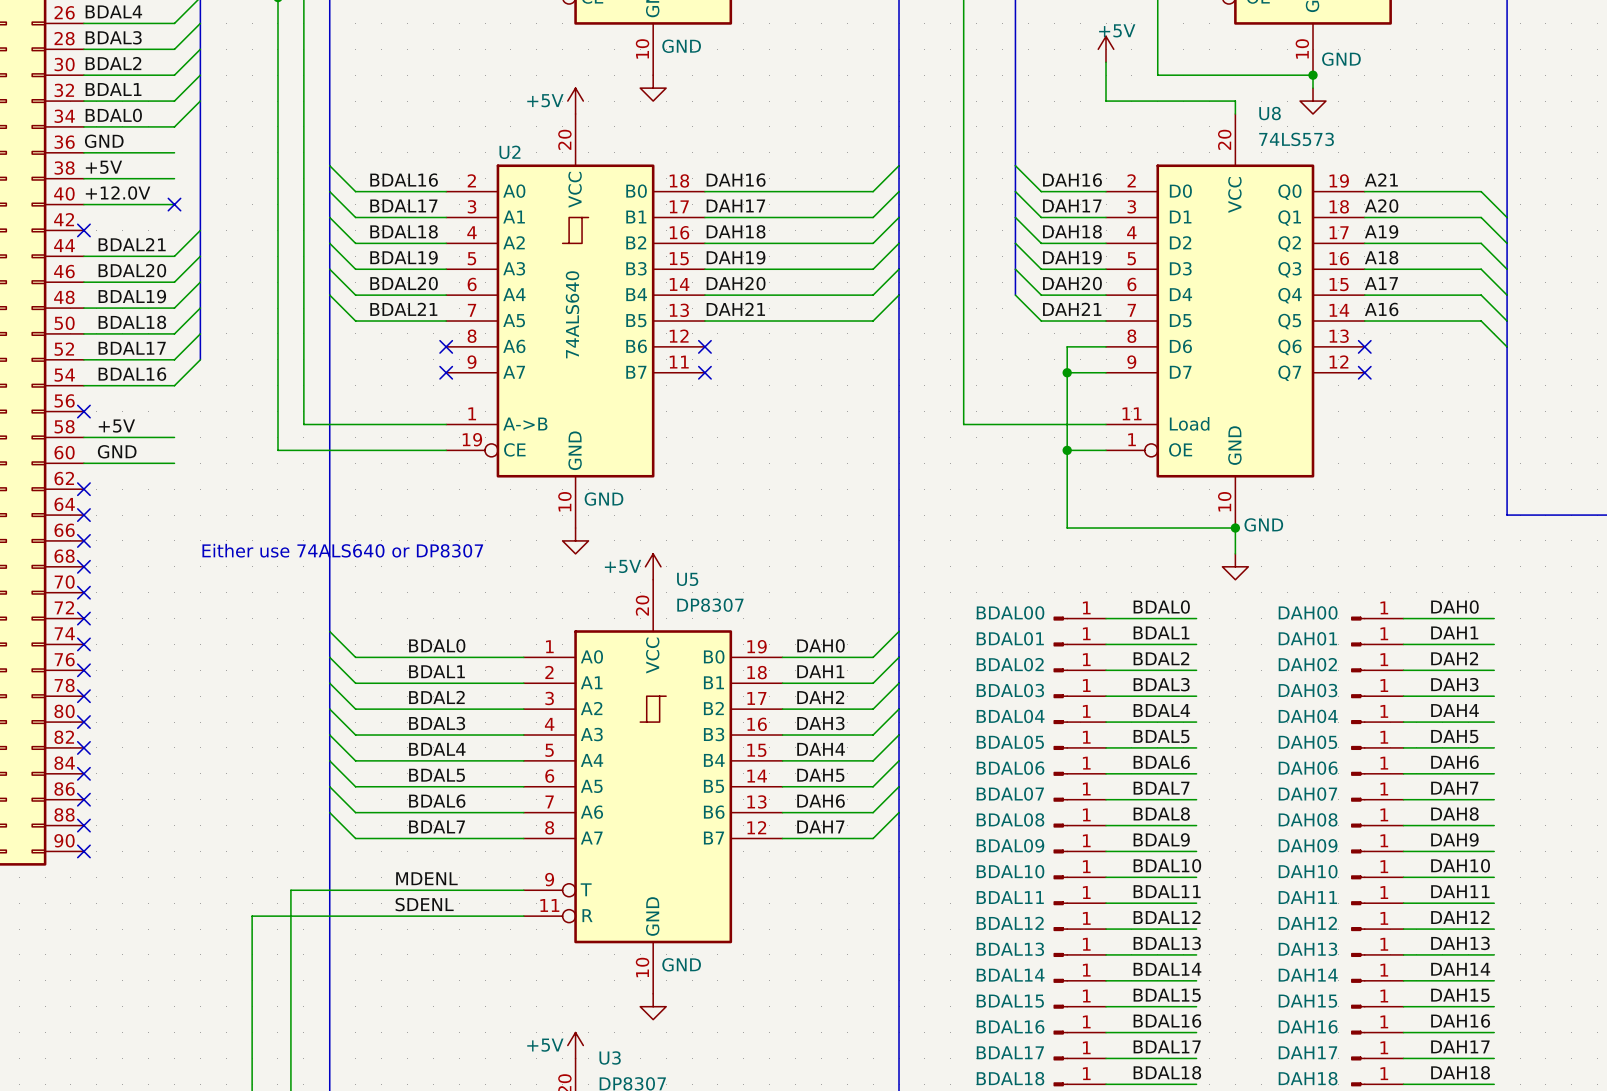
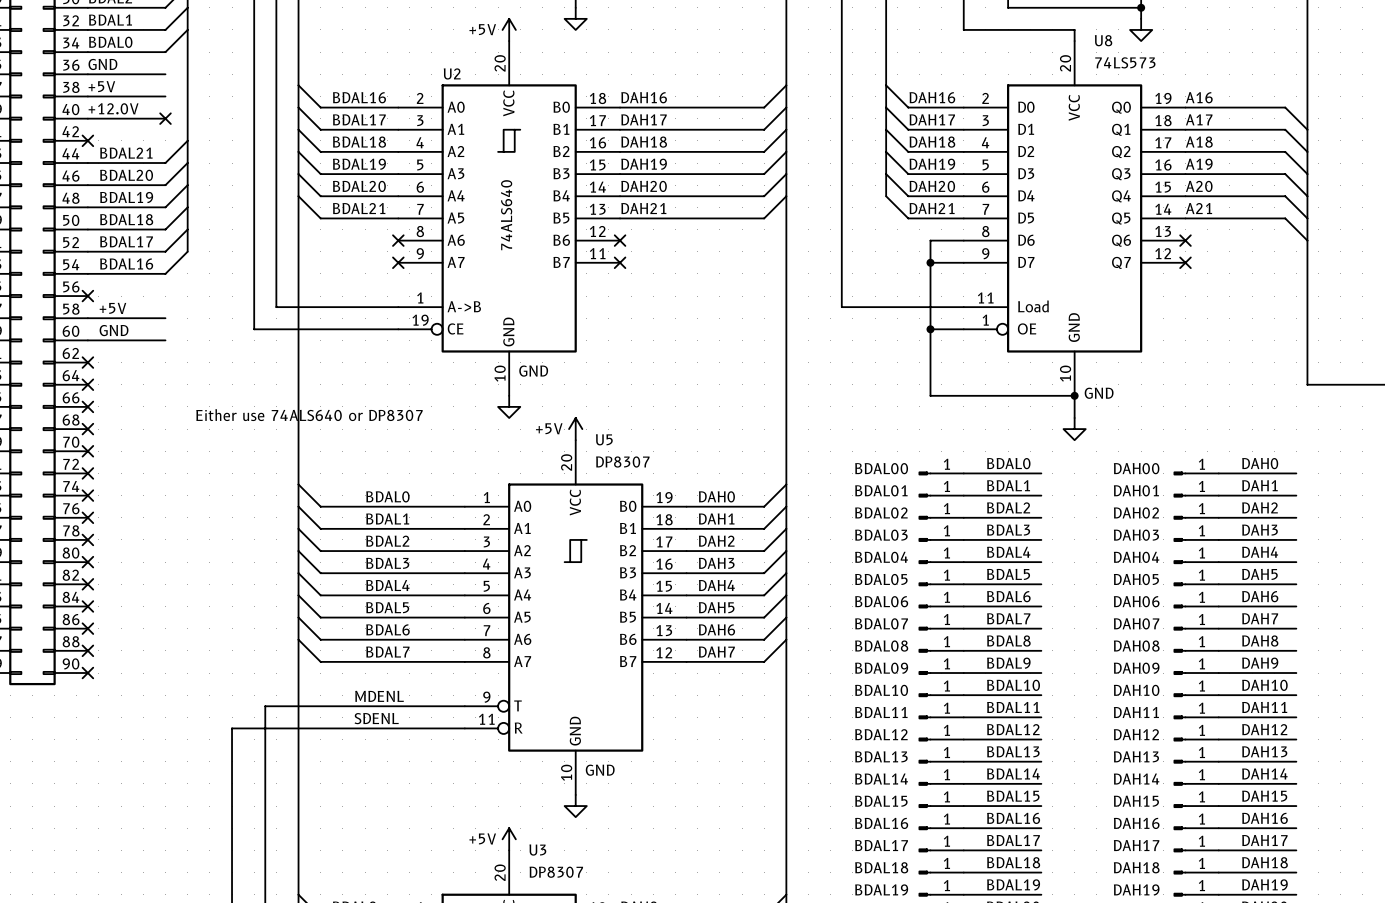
label: A21 (1381, 179) -> A16 (1199, 97)
label: A20 (1381, 205) -> A17 (1199, 119)
label: A19 (1381, 231) -> A18 (1199, 142)
label: A18 (1381, 257) -> A19 (1199, 164)
label: A17 (1381, 283) -> A20 (1199, 186)
label: A16 (1381, 309) -> A21 (1199, 208)

